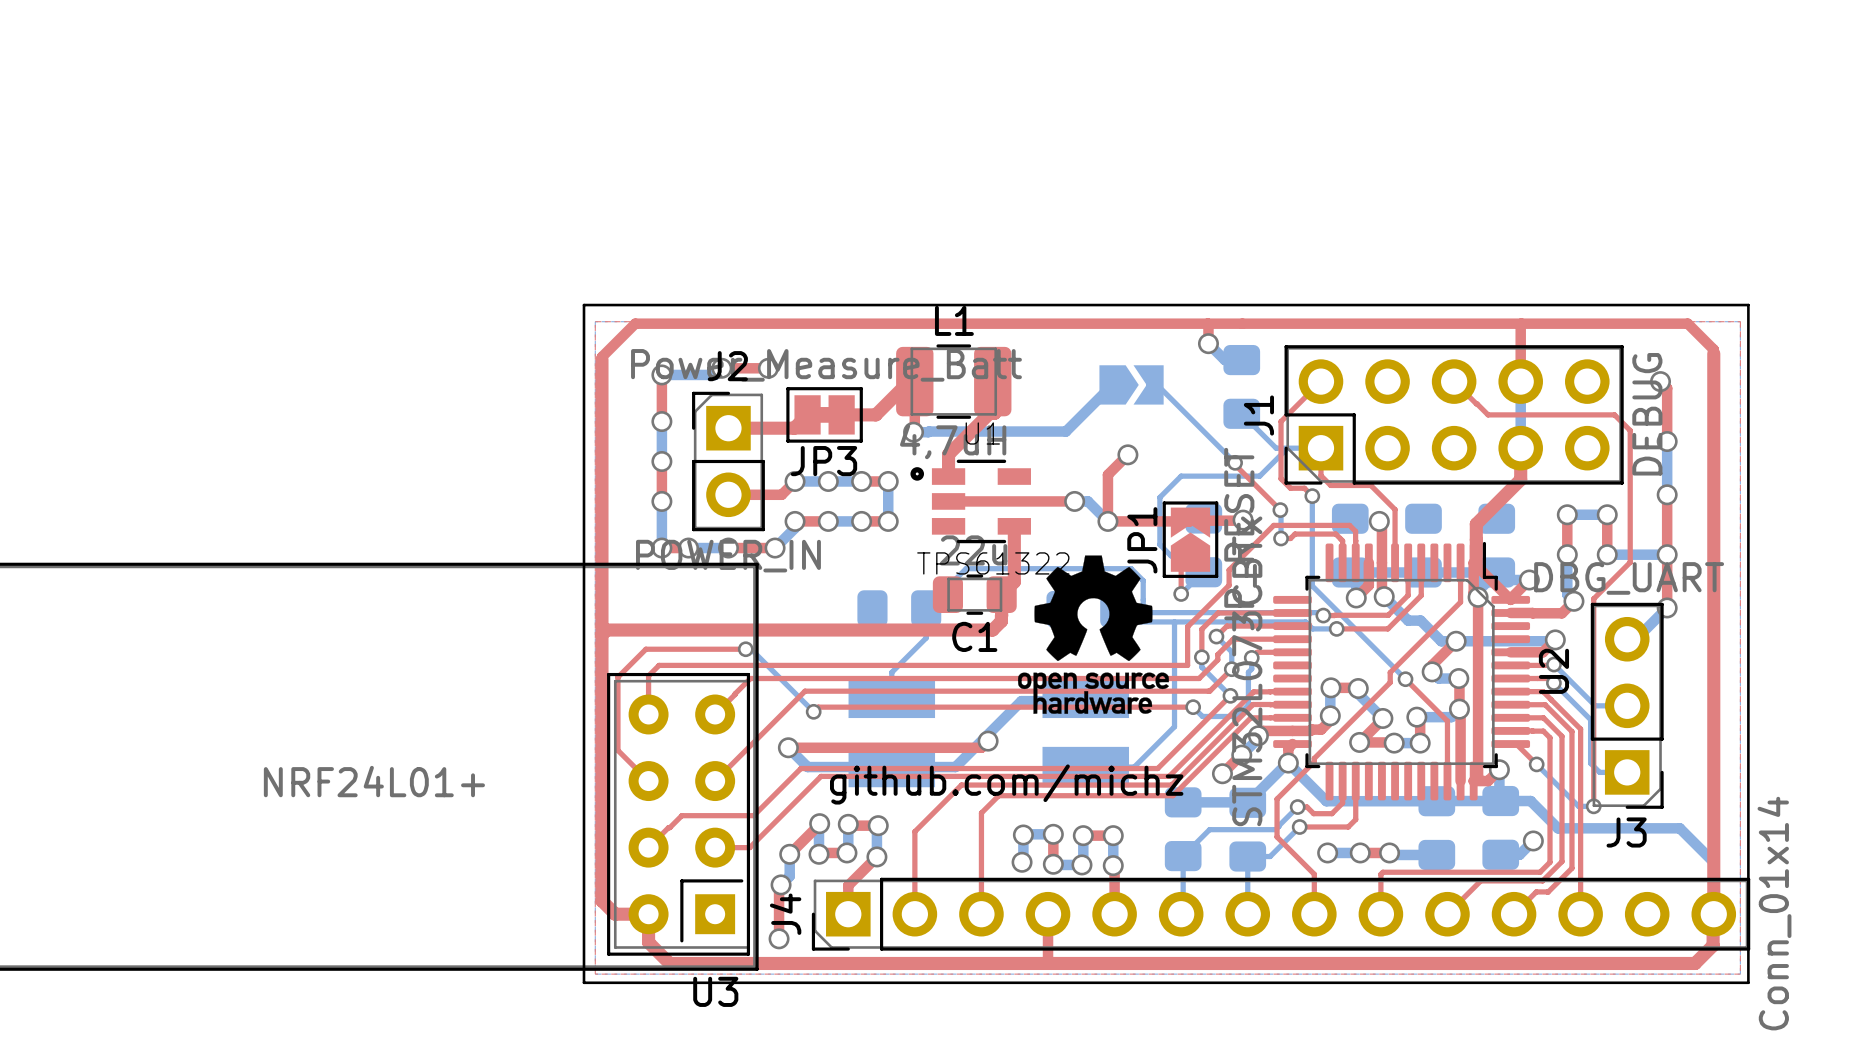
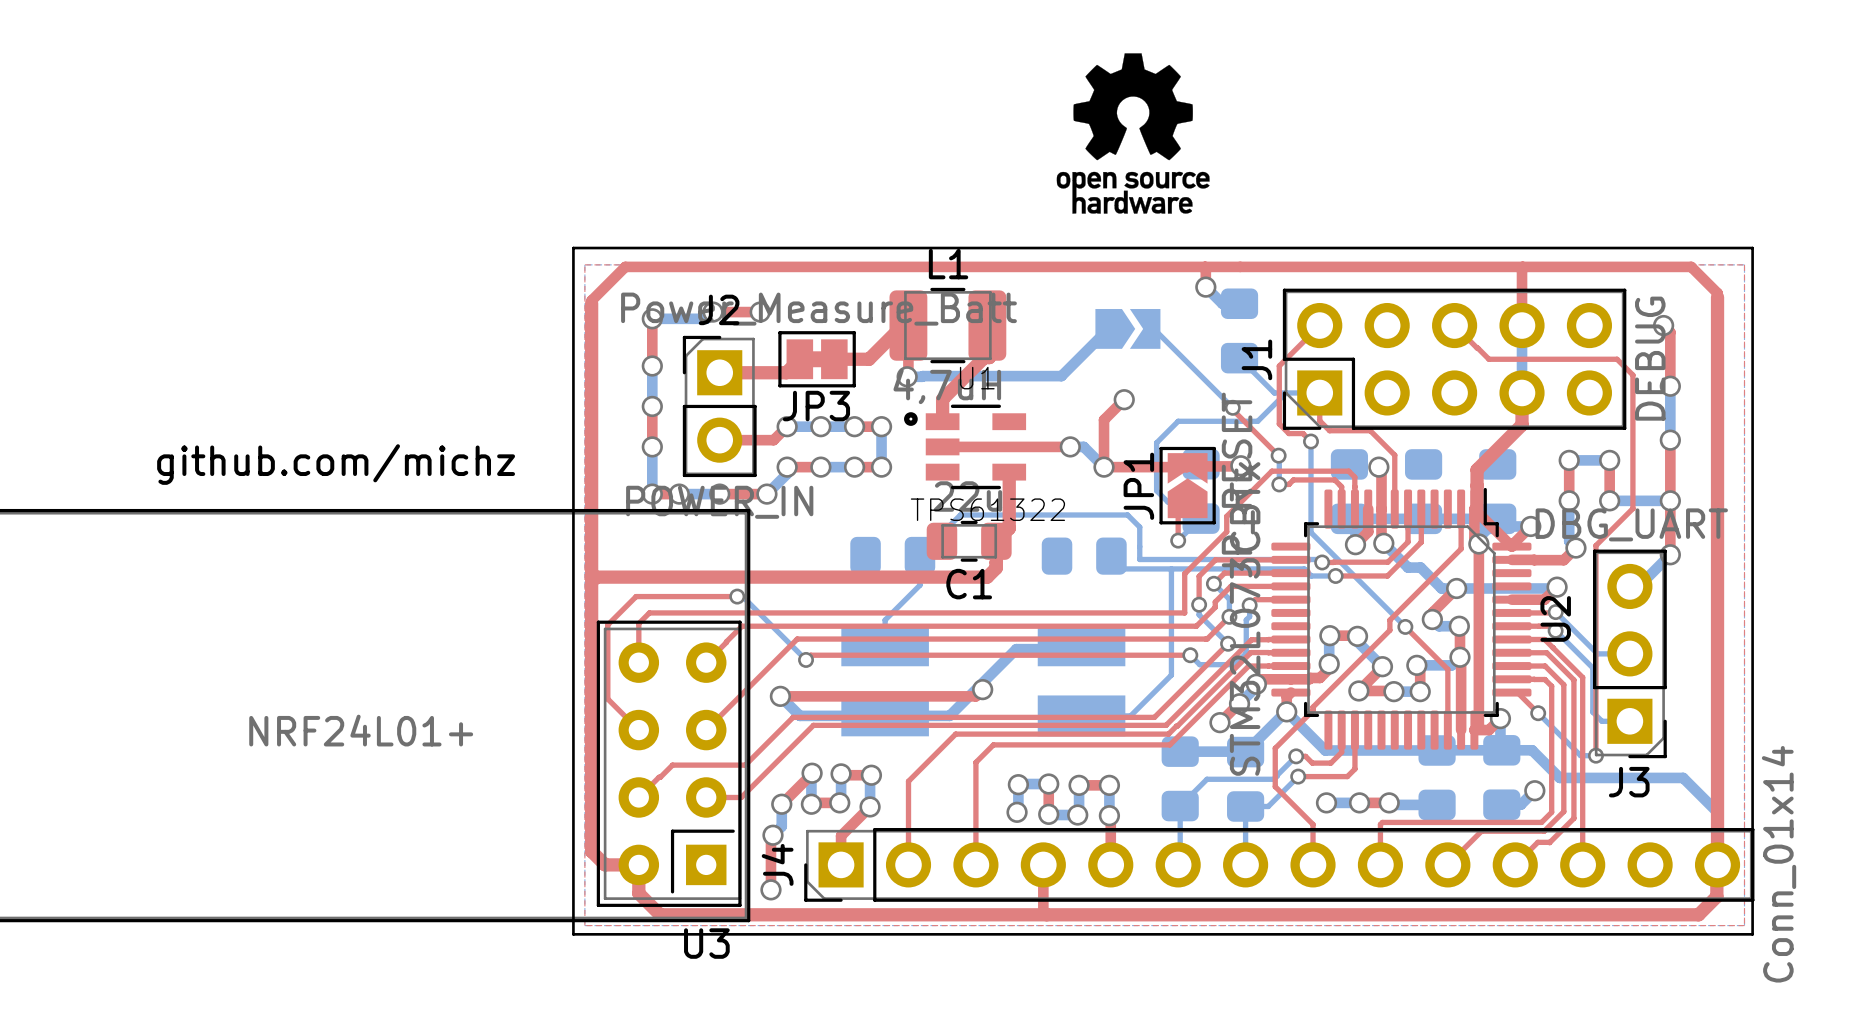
text: none -> github.com/michz (336, 464)
drawing position: (1093, 634) -> (1133, 133)
text: github.com/michz (1006, 784) -> none

